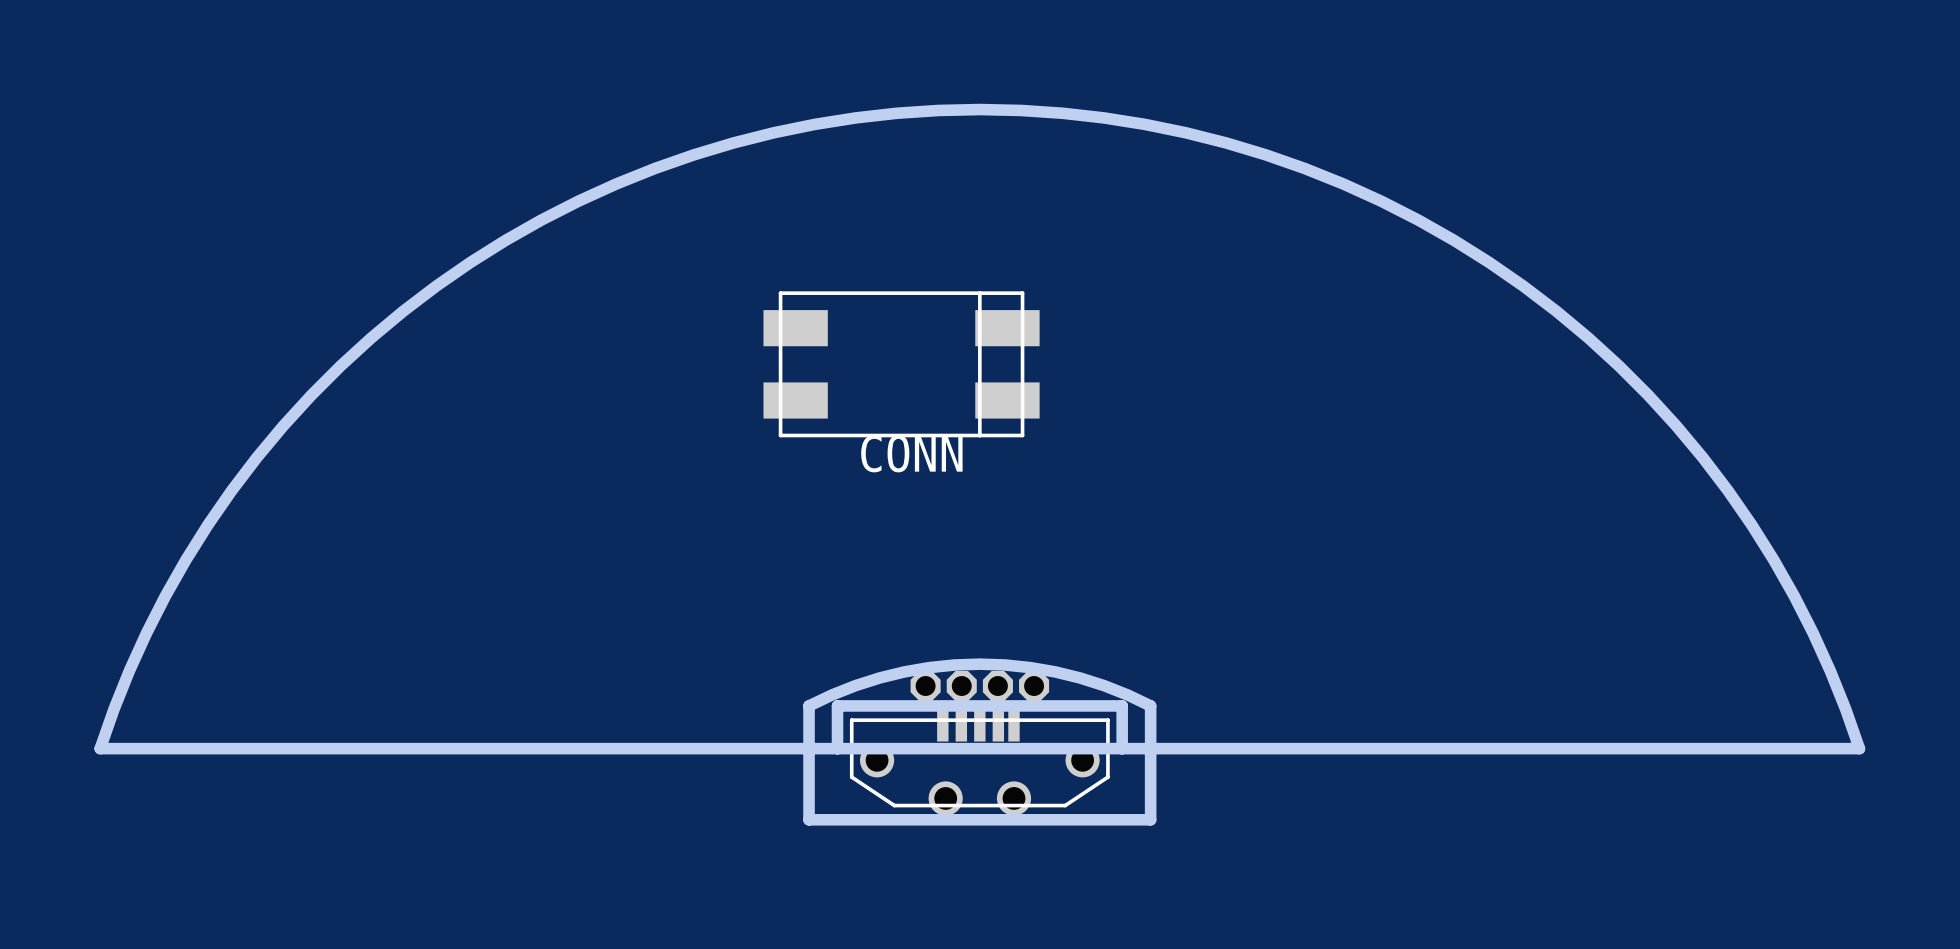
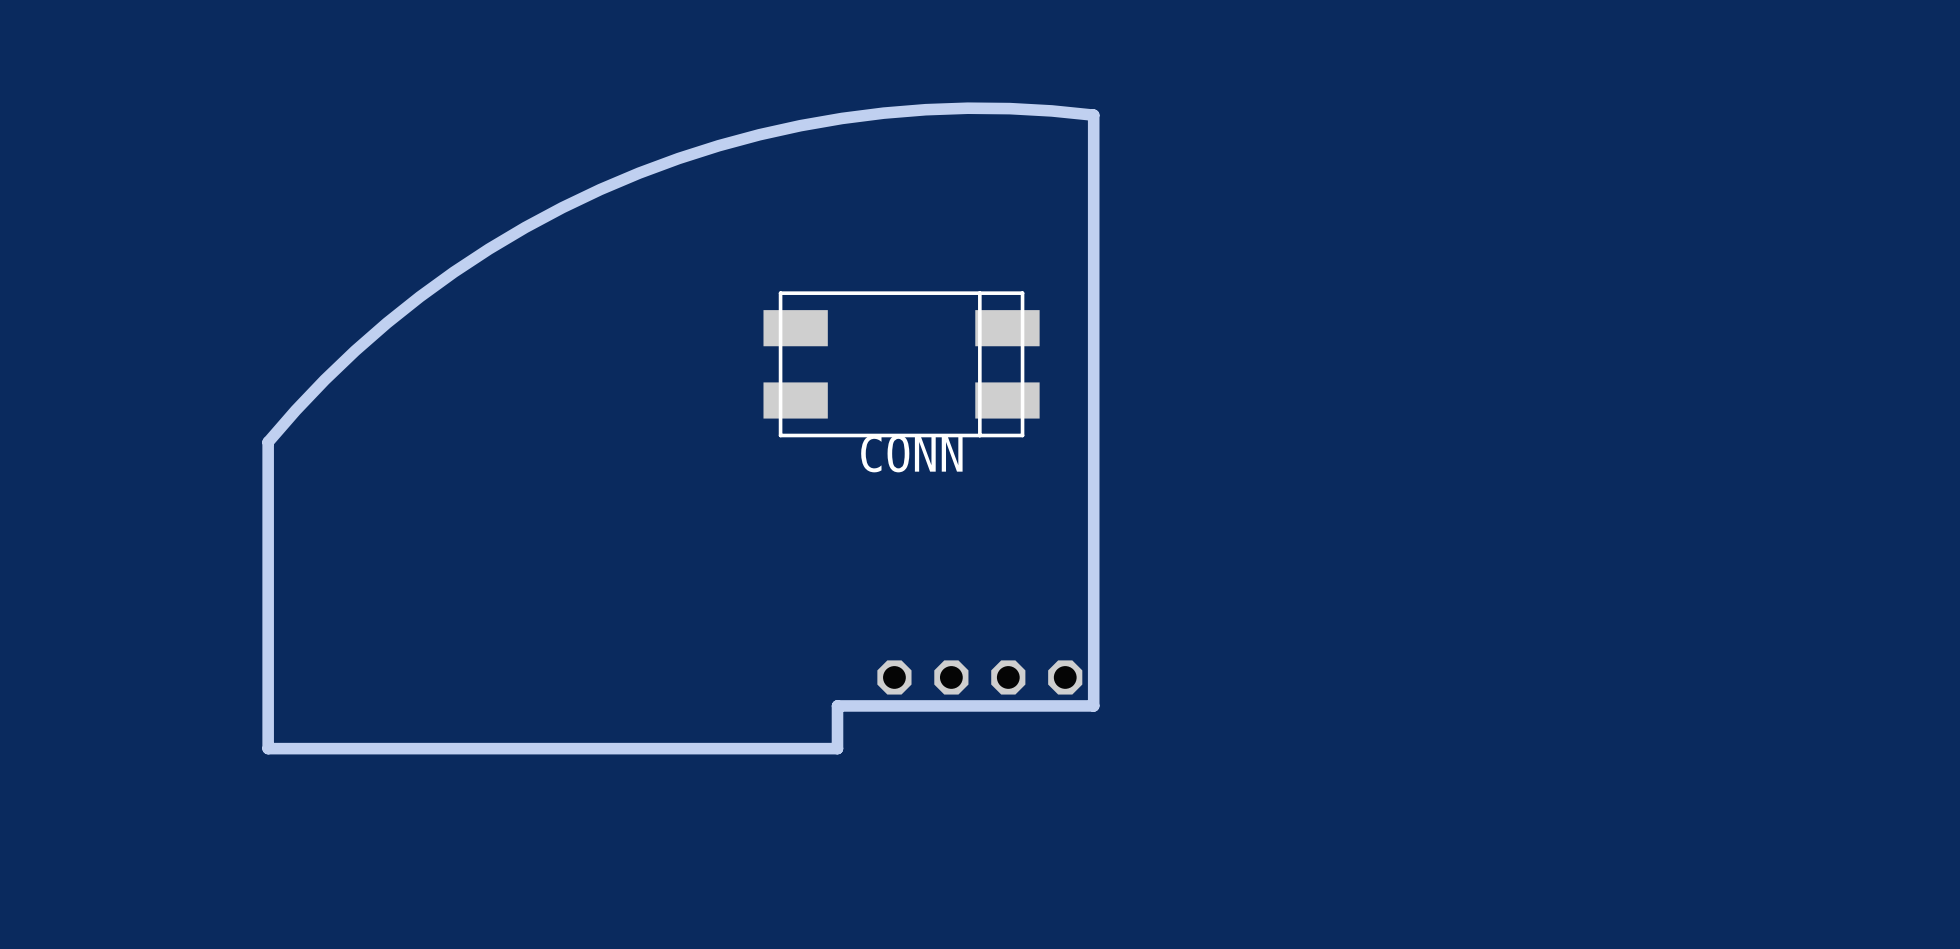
part footprint: [910, 670, 1050, 702] -> [877, 660, 1083, 695]
board edge: (1093, 705) (1122, 705) (1122, 748) -> none
board edge: (1150, 705) (1150, 819) (809, 819) (809, 705) (855, 685) (904, 671) (929, 667) (954, 665) (1005, 665) (1055, 671) (1080, 677) (1127, 695) (1150, 705) -> none
board edge: (837, 748) (1859, 748) (1830, 670) (1794, 596) (1773, 560) (1728, 490) (1676, 425) (1619, 365) (1556, 311) (1523, 286) (1454, 240) (1418, 219) (1343, 183) (1265, 154) (1185, 132) (1103, 117) (1062, 113) (979, 109) (896, 113) (814, 124) (733, 142) (654, 168) (578, 201) (505, 240) (436, 286) (371, 337) (340, 365) (283, 425) (256, 457) (207, 524) (185, 560) (146, 633) (129, 670) (100, 748) (268, 748) -> (1093, 705) (1093, 115) (1009, 108) (925, 109) (841, 118) (759, 134) (678, 158) (600, 189) (525, 227) (453, 272) (386, 323) (324, 379) (268, 442) (268, 748)
part: (979, 760) -> none

